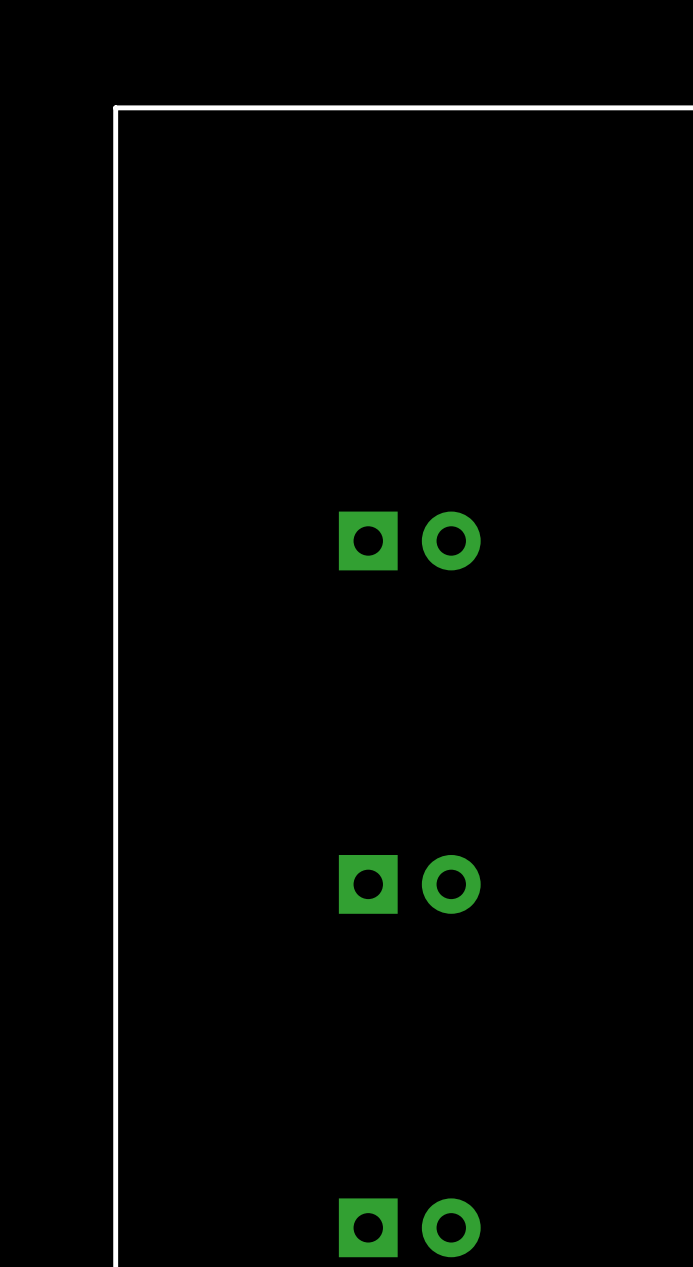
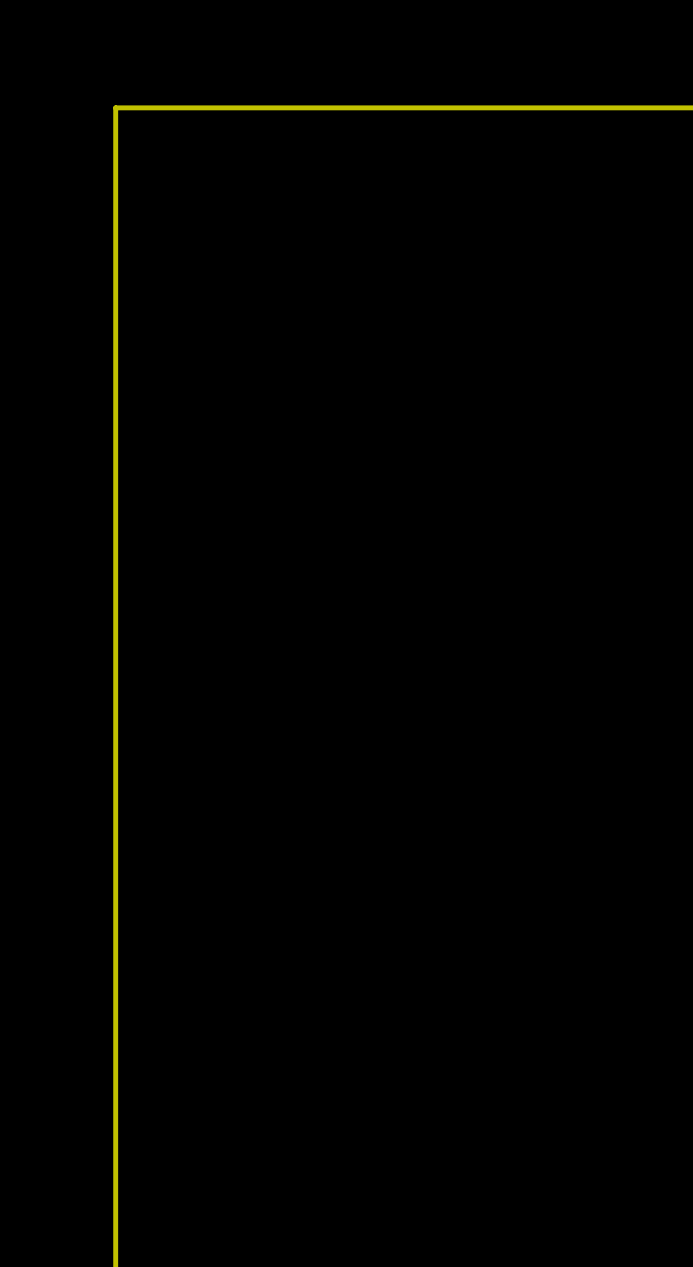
part: (409, 540) -> none
part: (409, 884) -> none
part: (409, 1227) -> none

